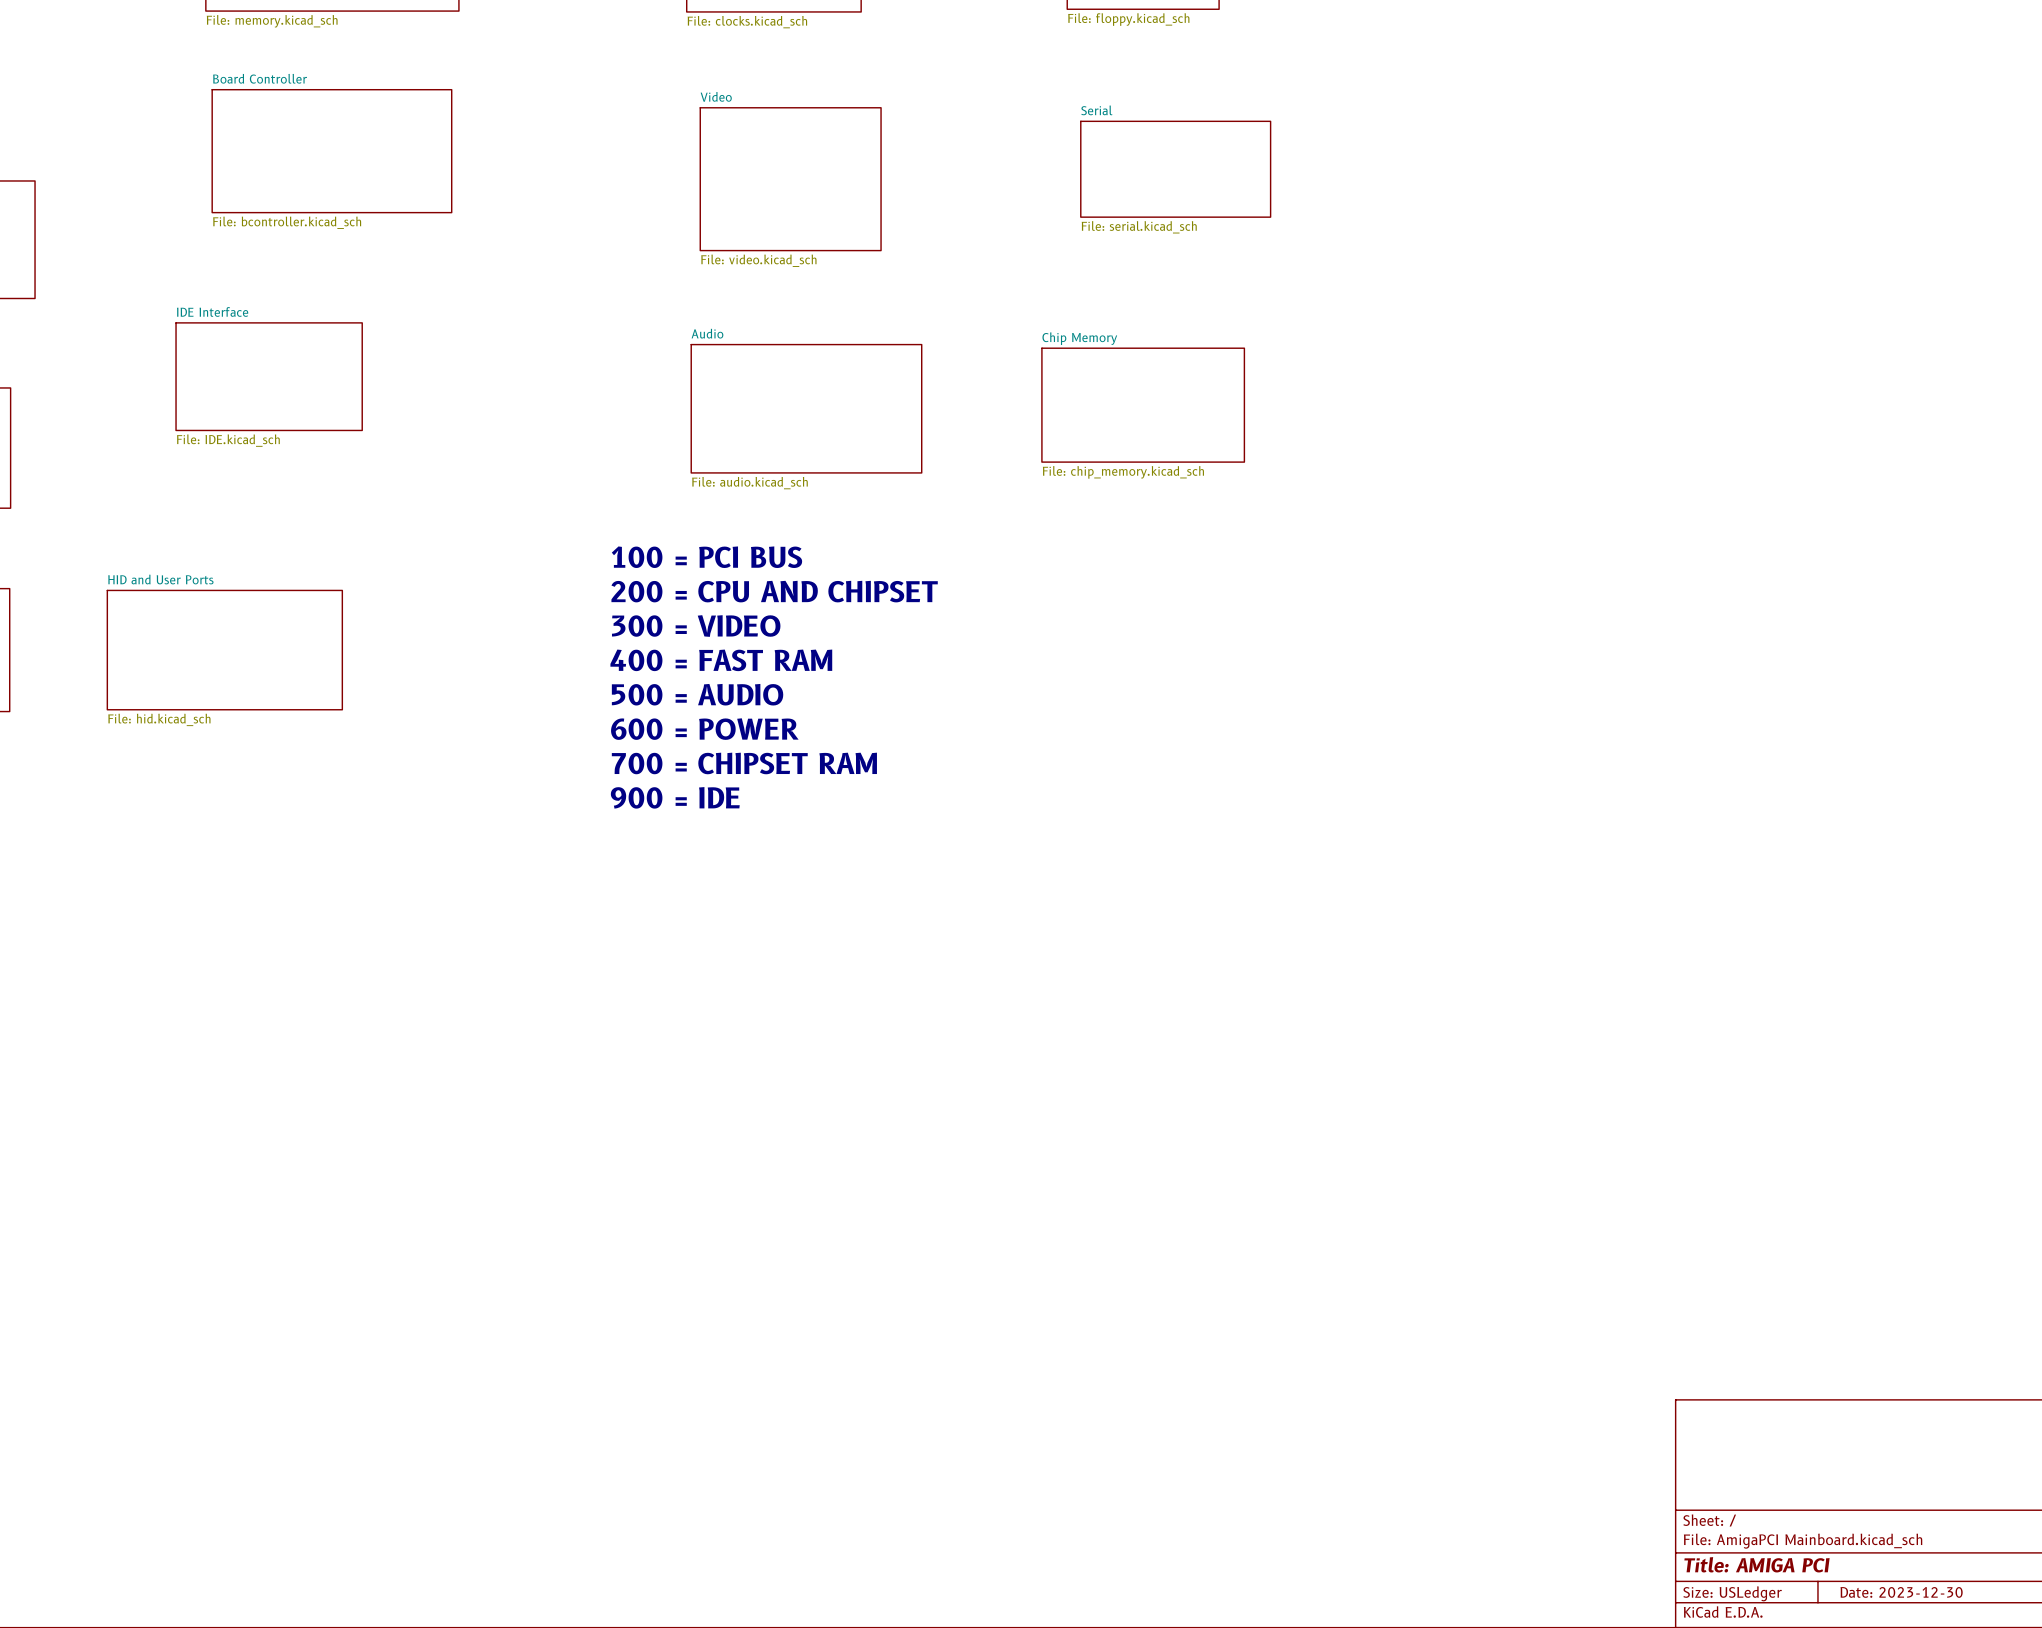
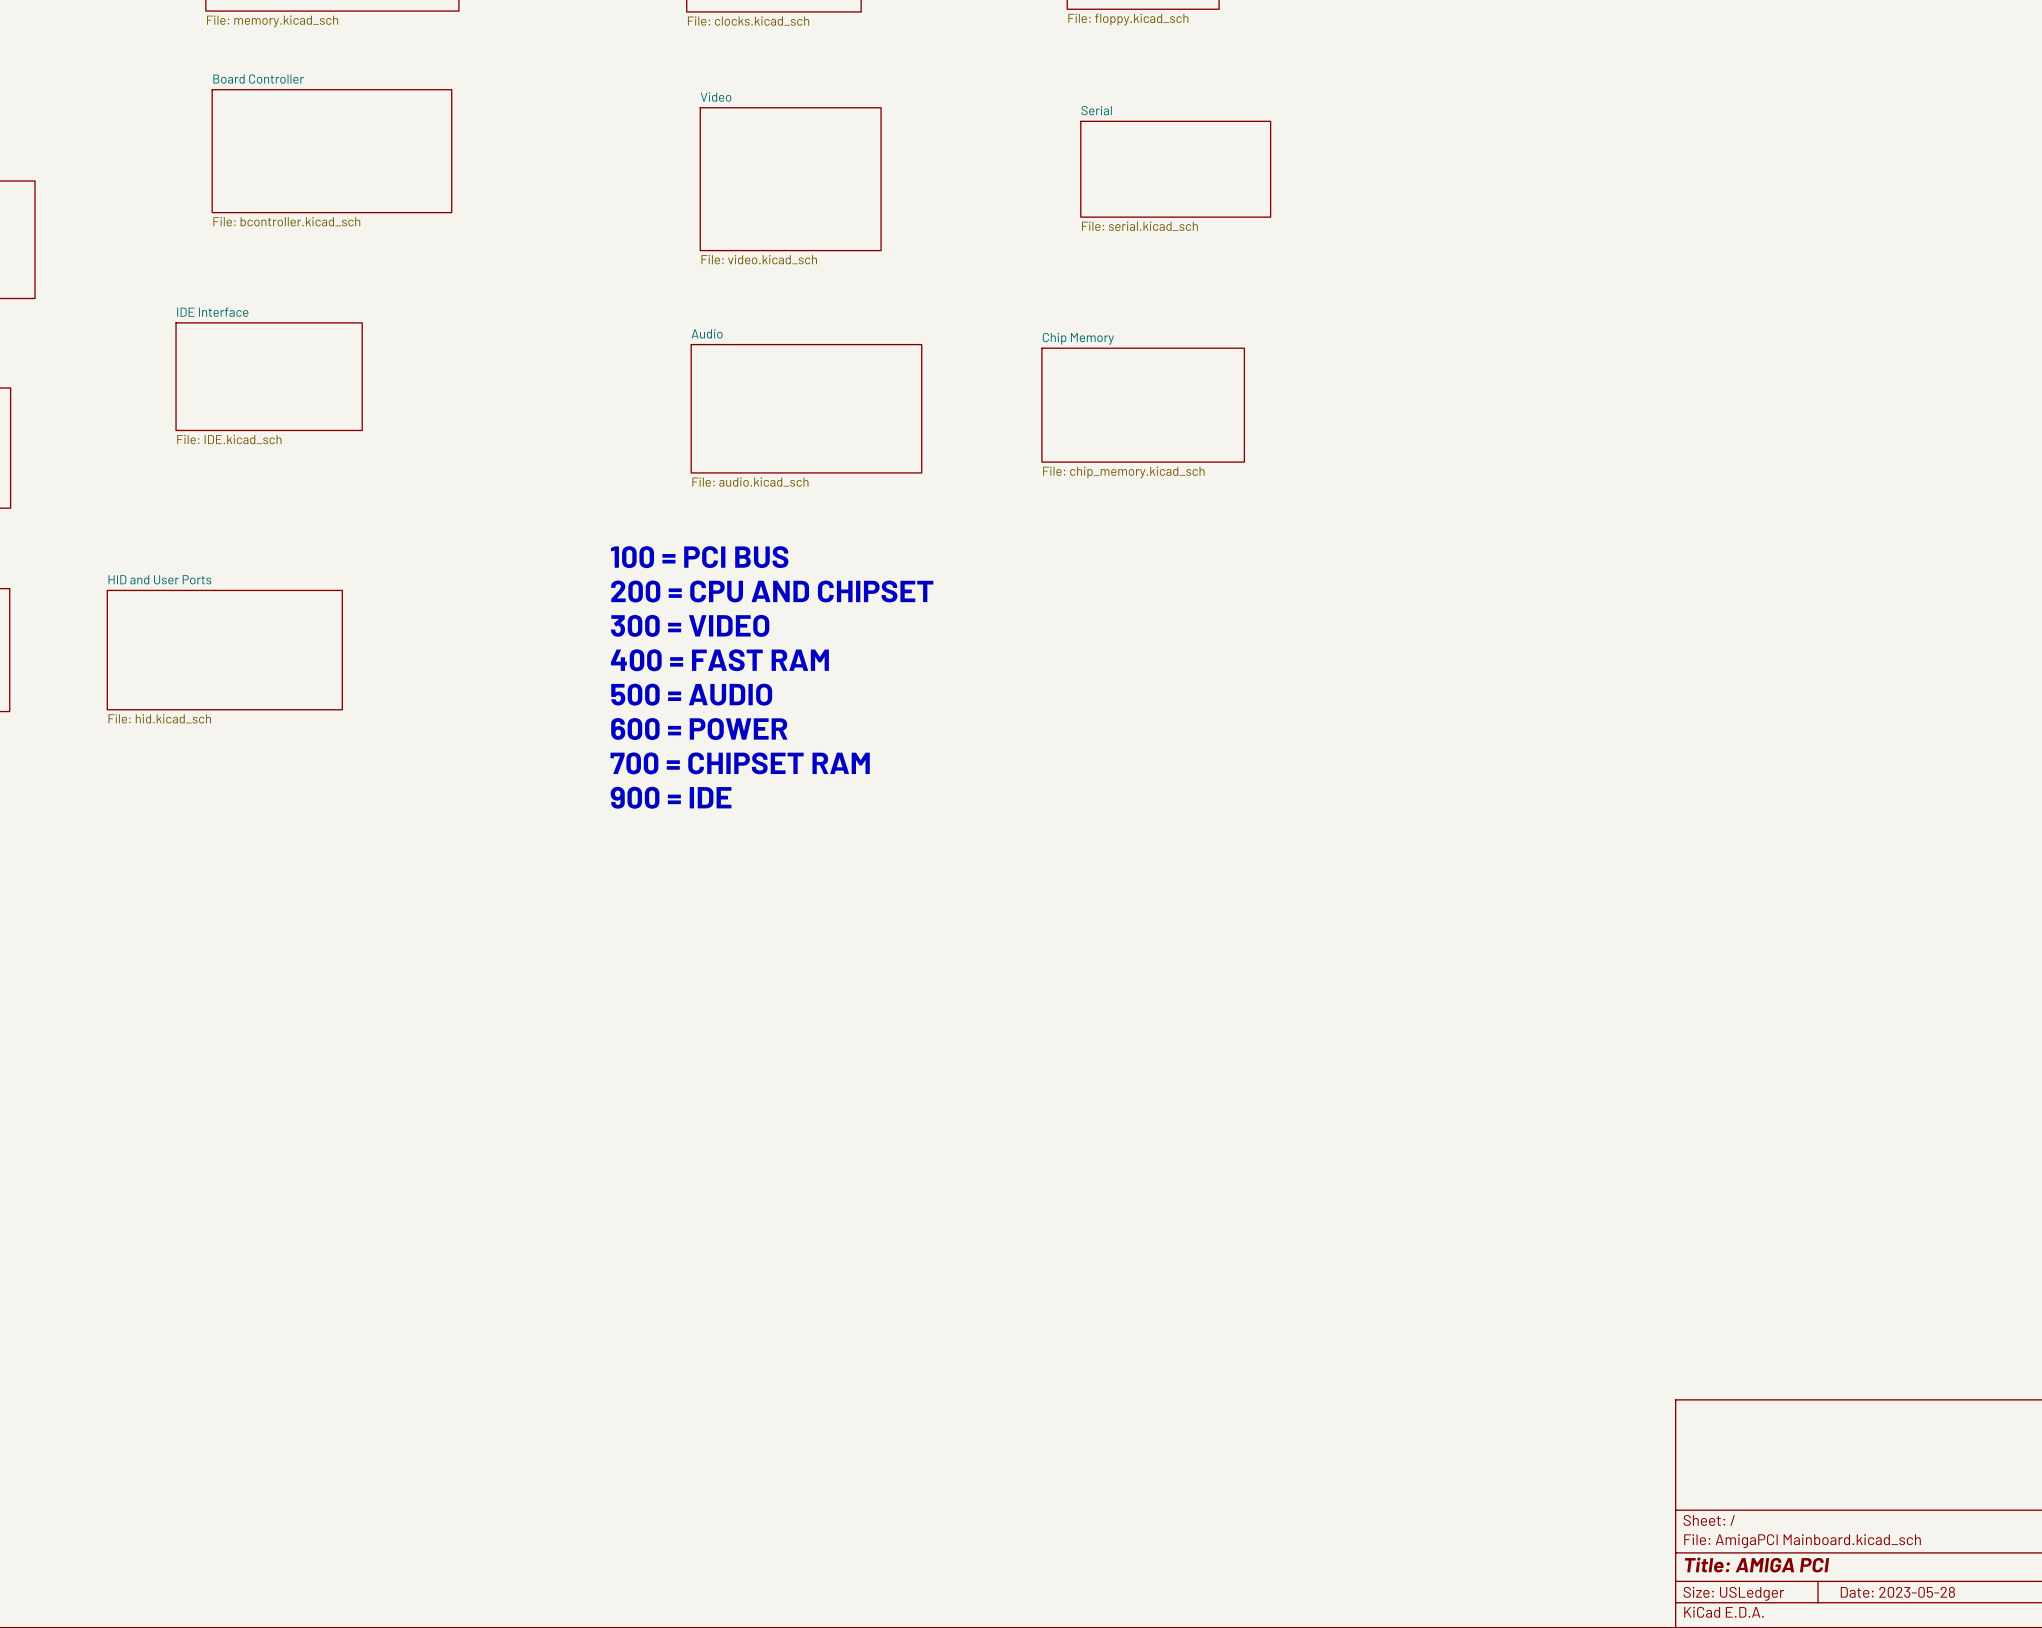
title block: Date: 2023-12-30 (1901, 1592) -> Date: 2023-05-28 (1897, 1592)

